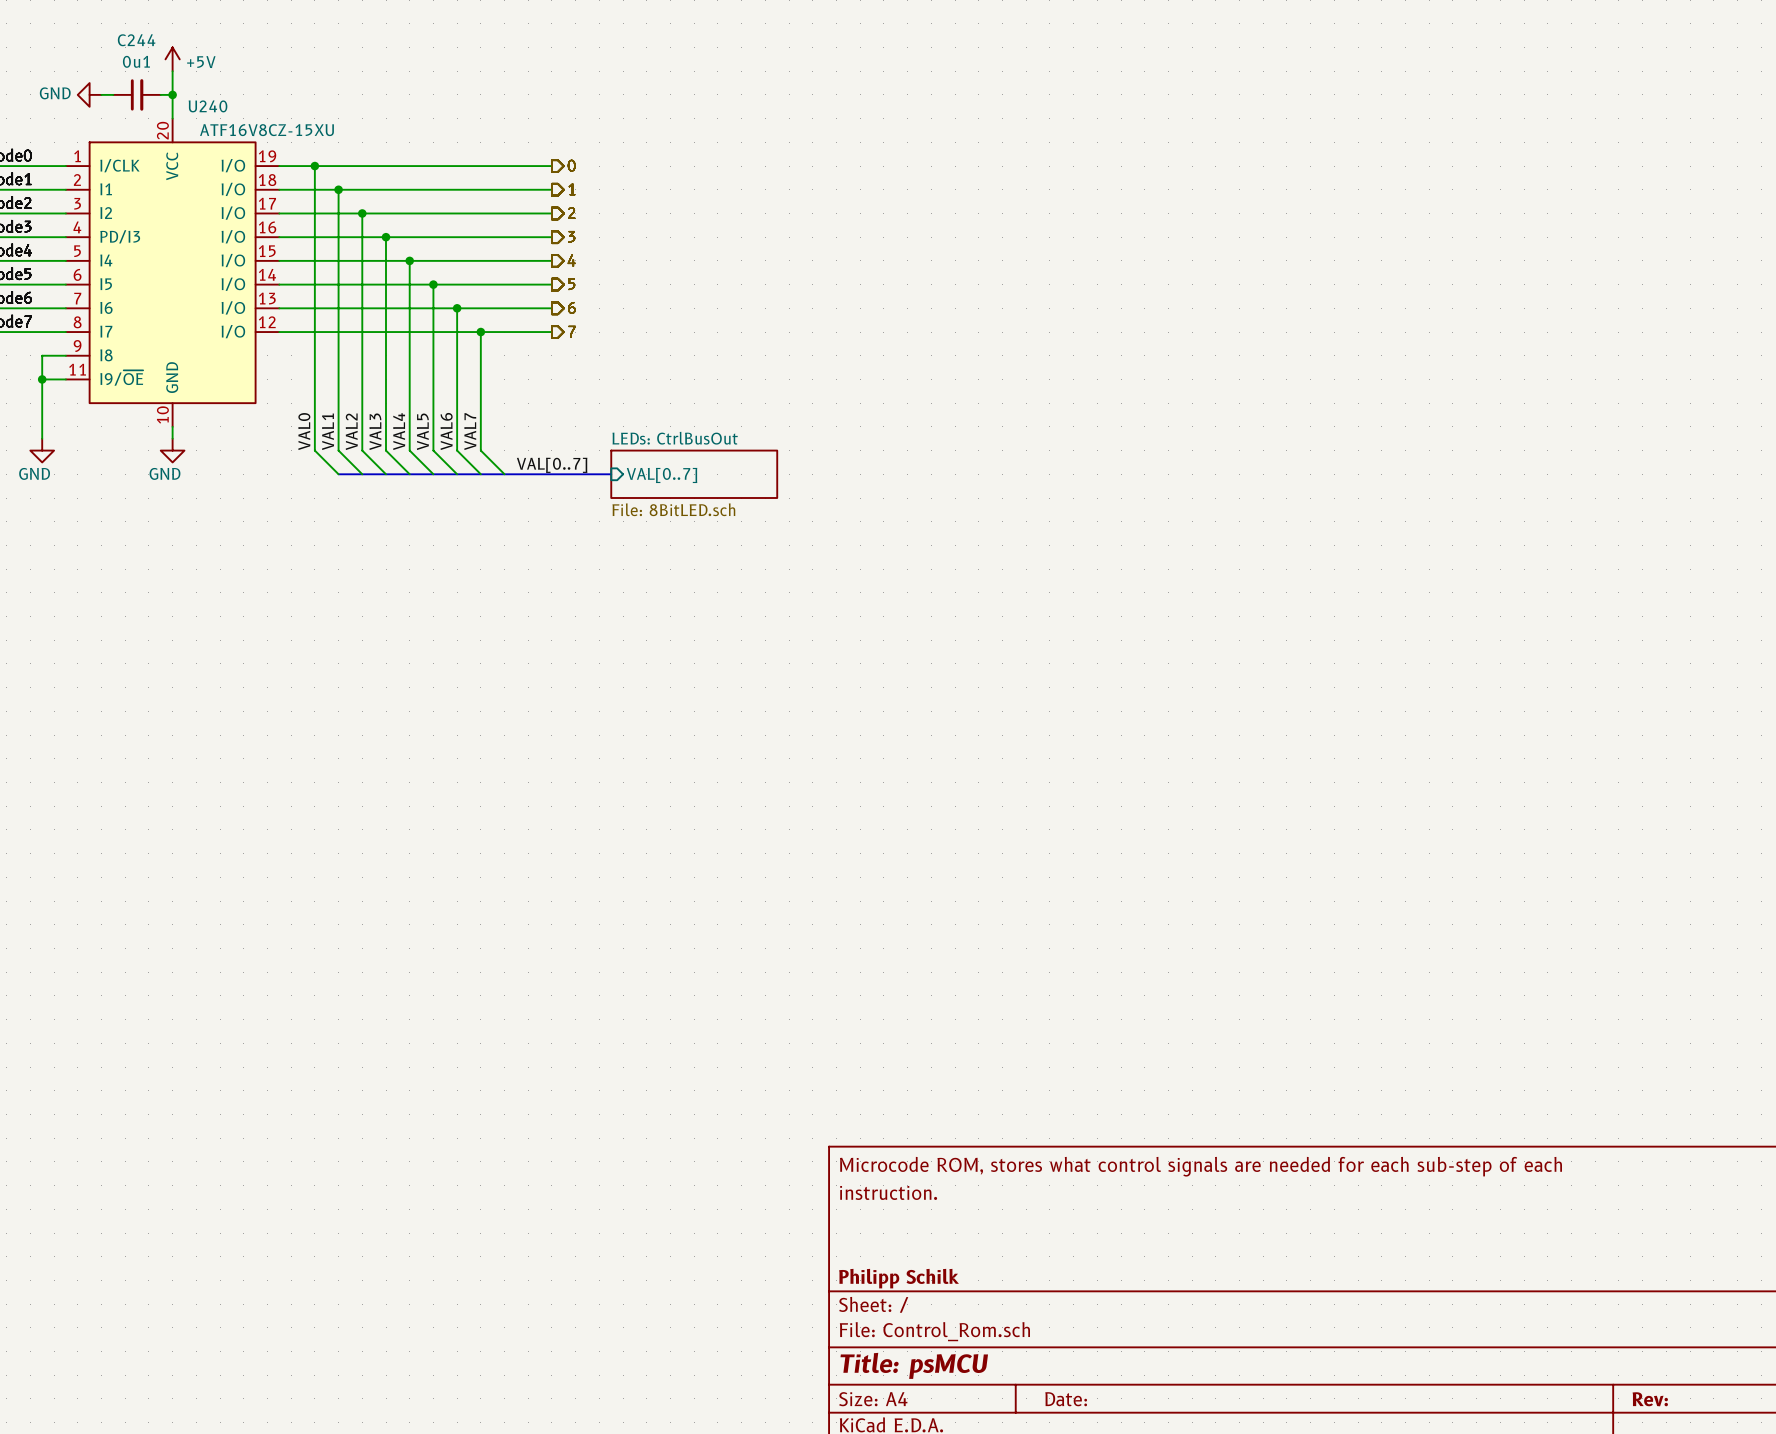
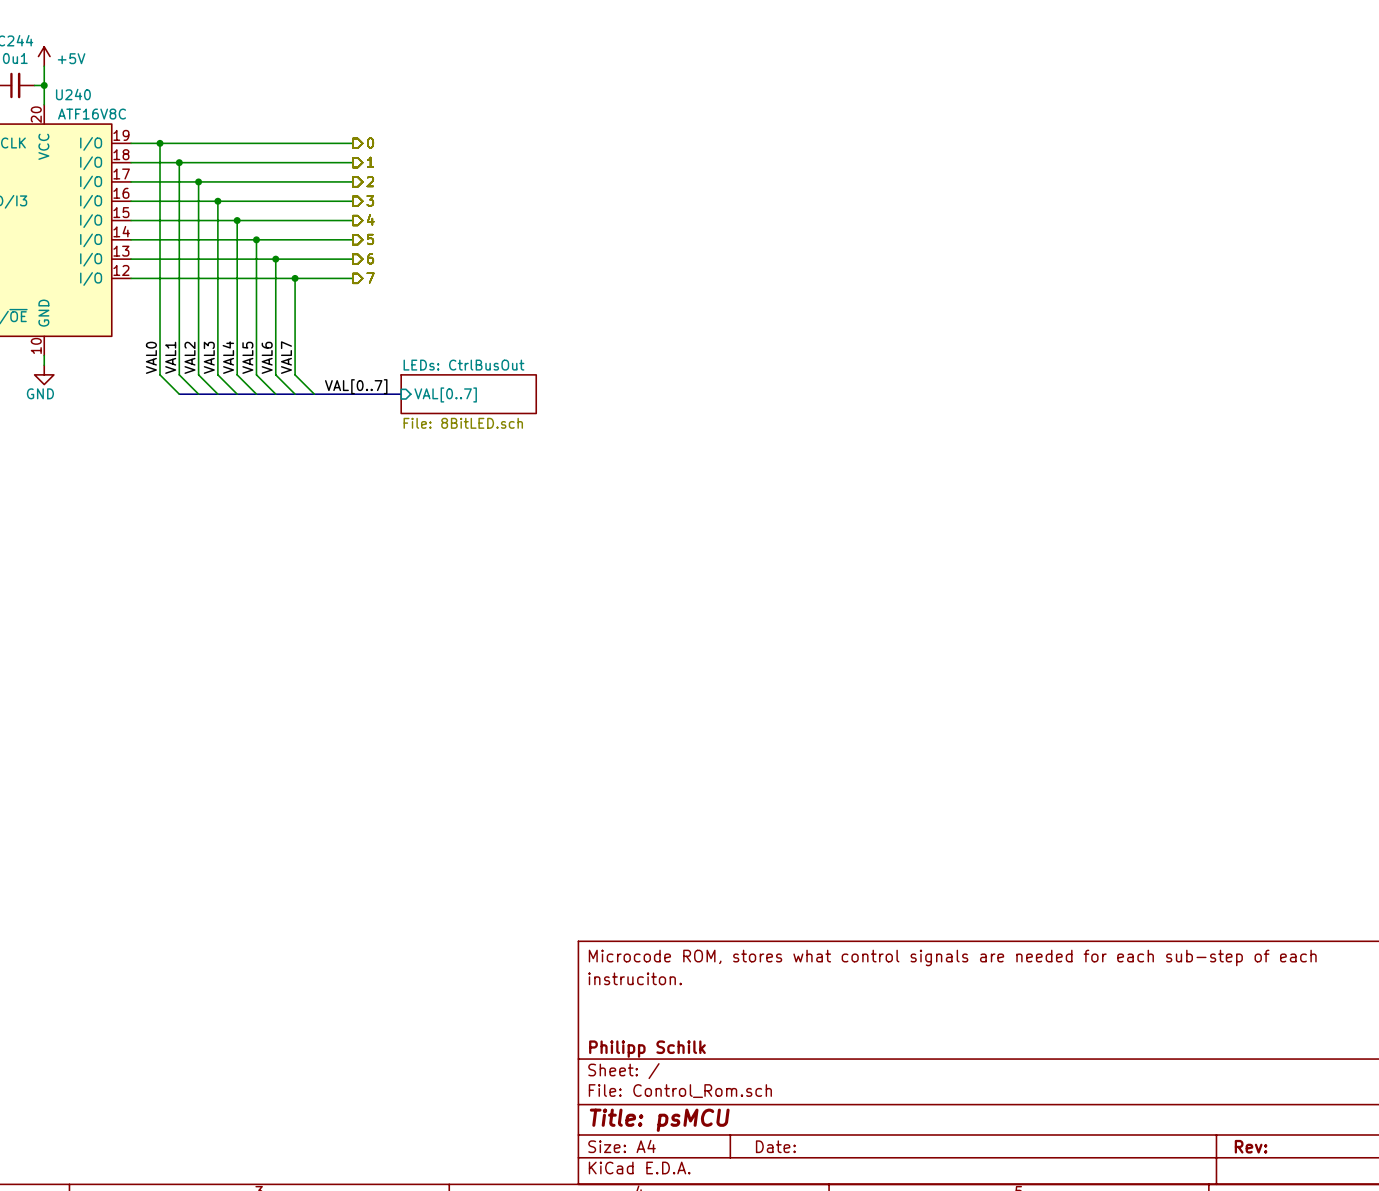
U240 value: ATF16V8CZ-15XU (266, 130) -> ATF16V8C (92, 114)
title block: instruction. (888, 1192) -> instruciton. (635, 978)

